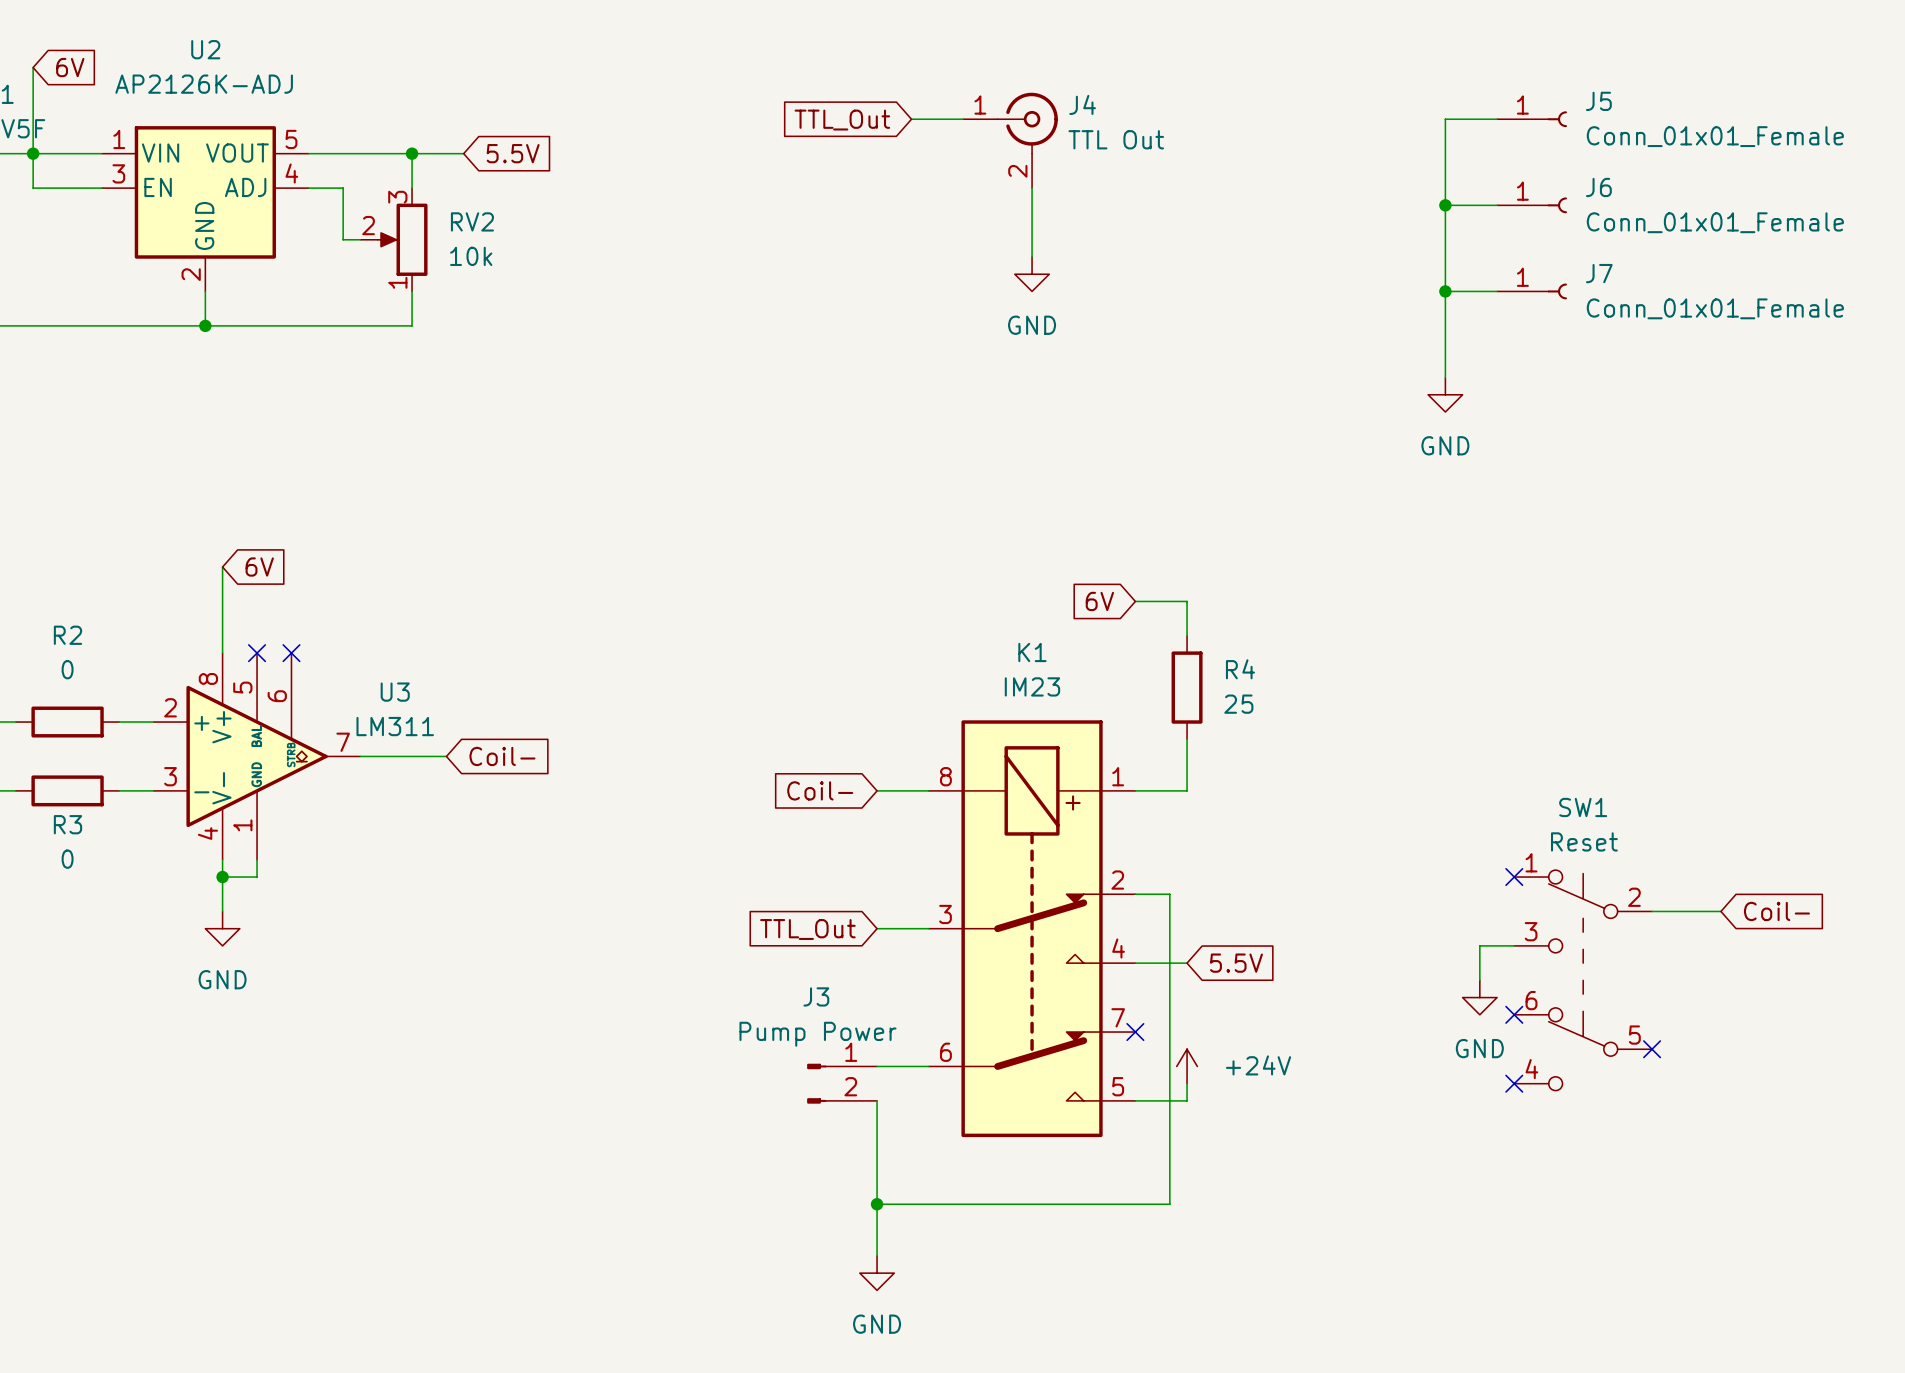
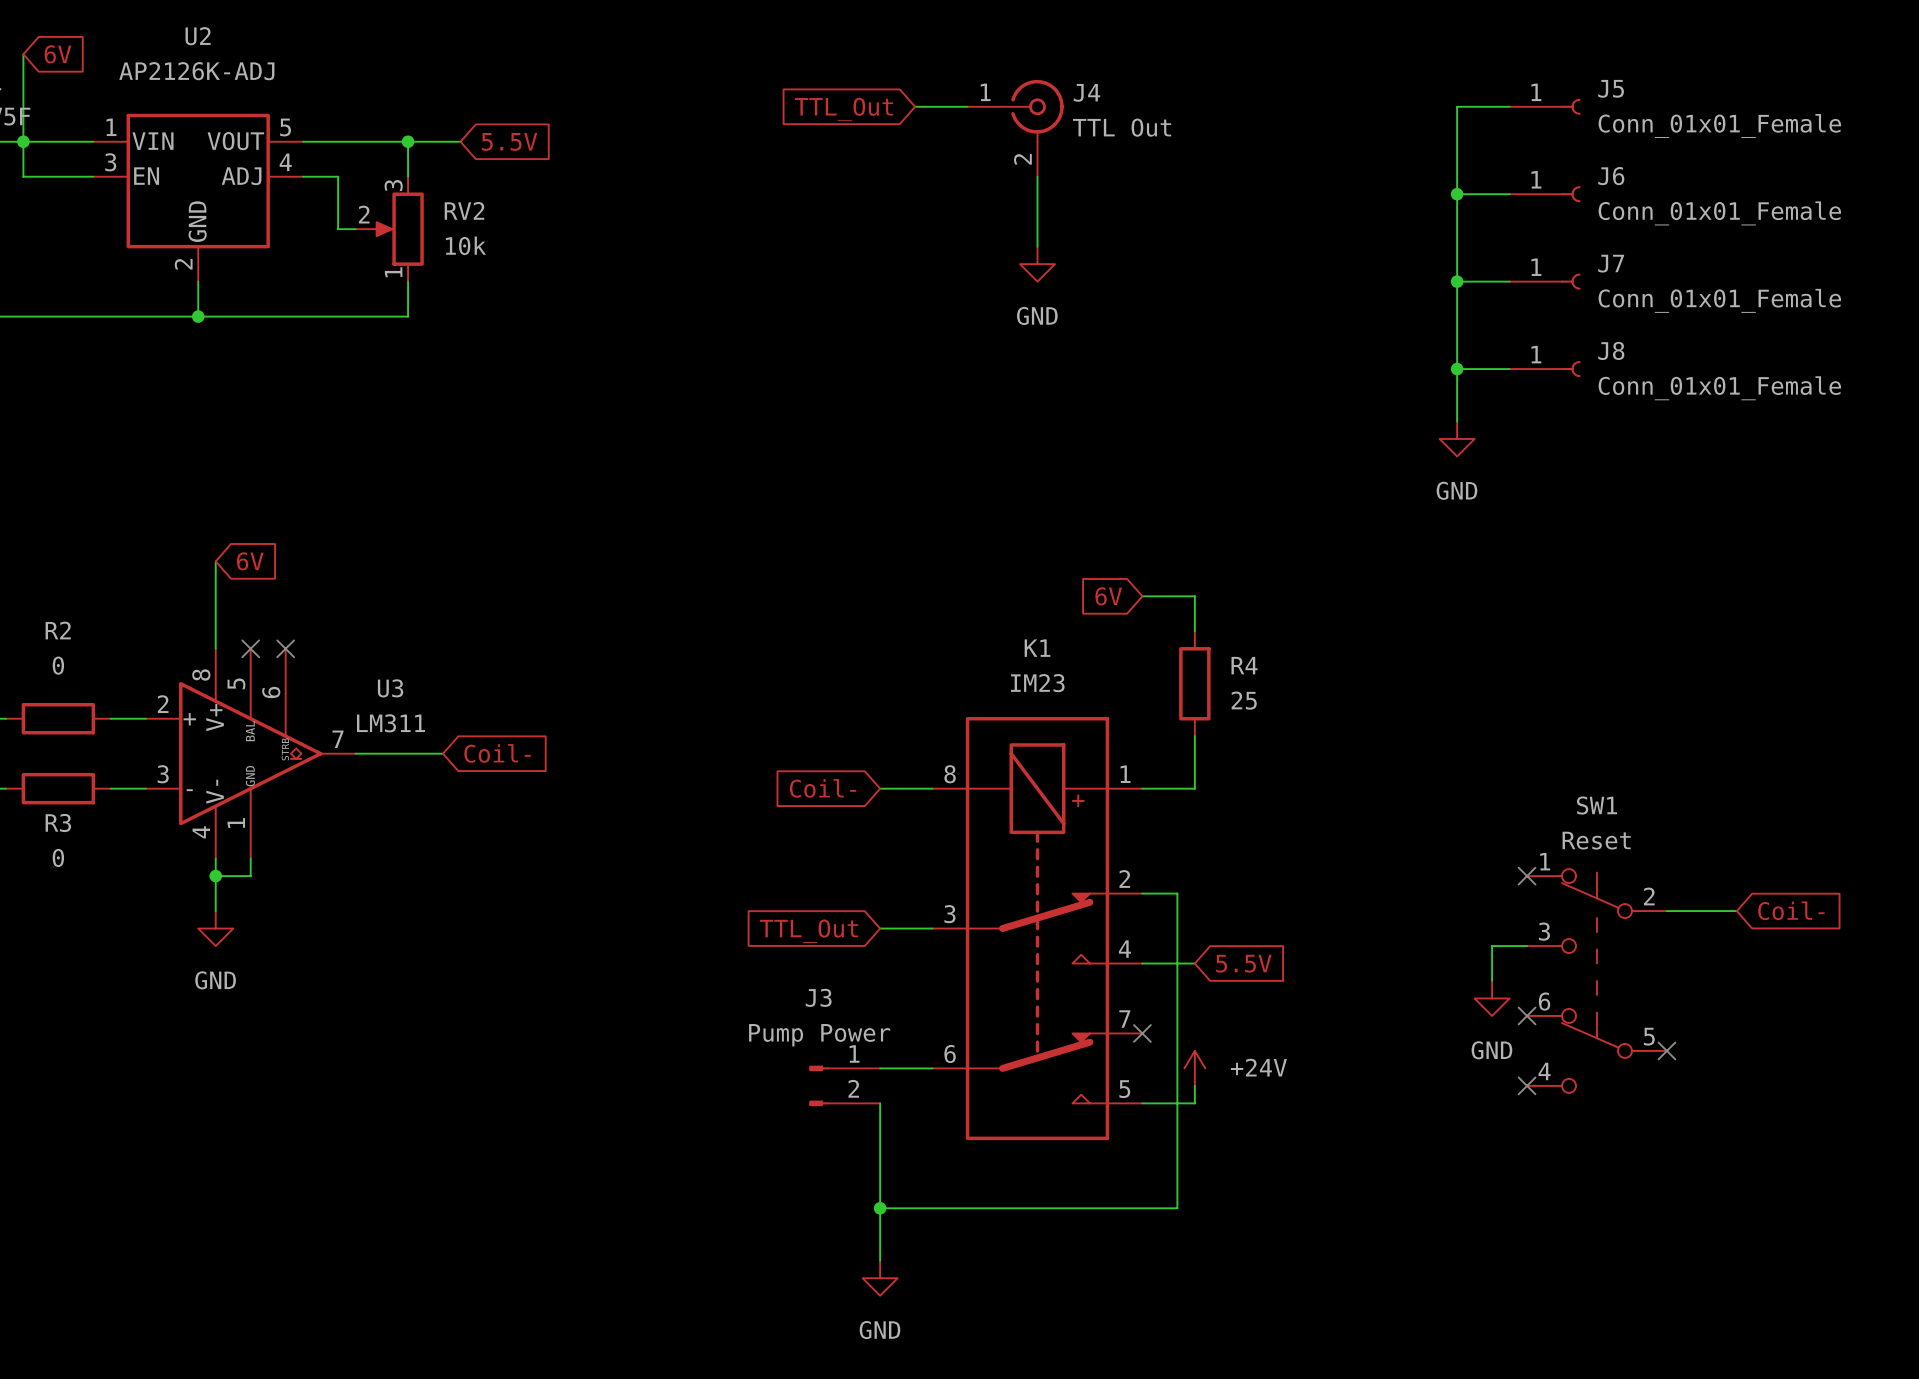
junction: none -> (1457, 369)
wire: none -> (1509, 369) (1457, 369) (1457, 421)
J8: none -> Conn_01x01_Female (1545, 369)
power symbol position: GND (1445, 394) -> GND (1457, 438)

